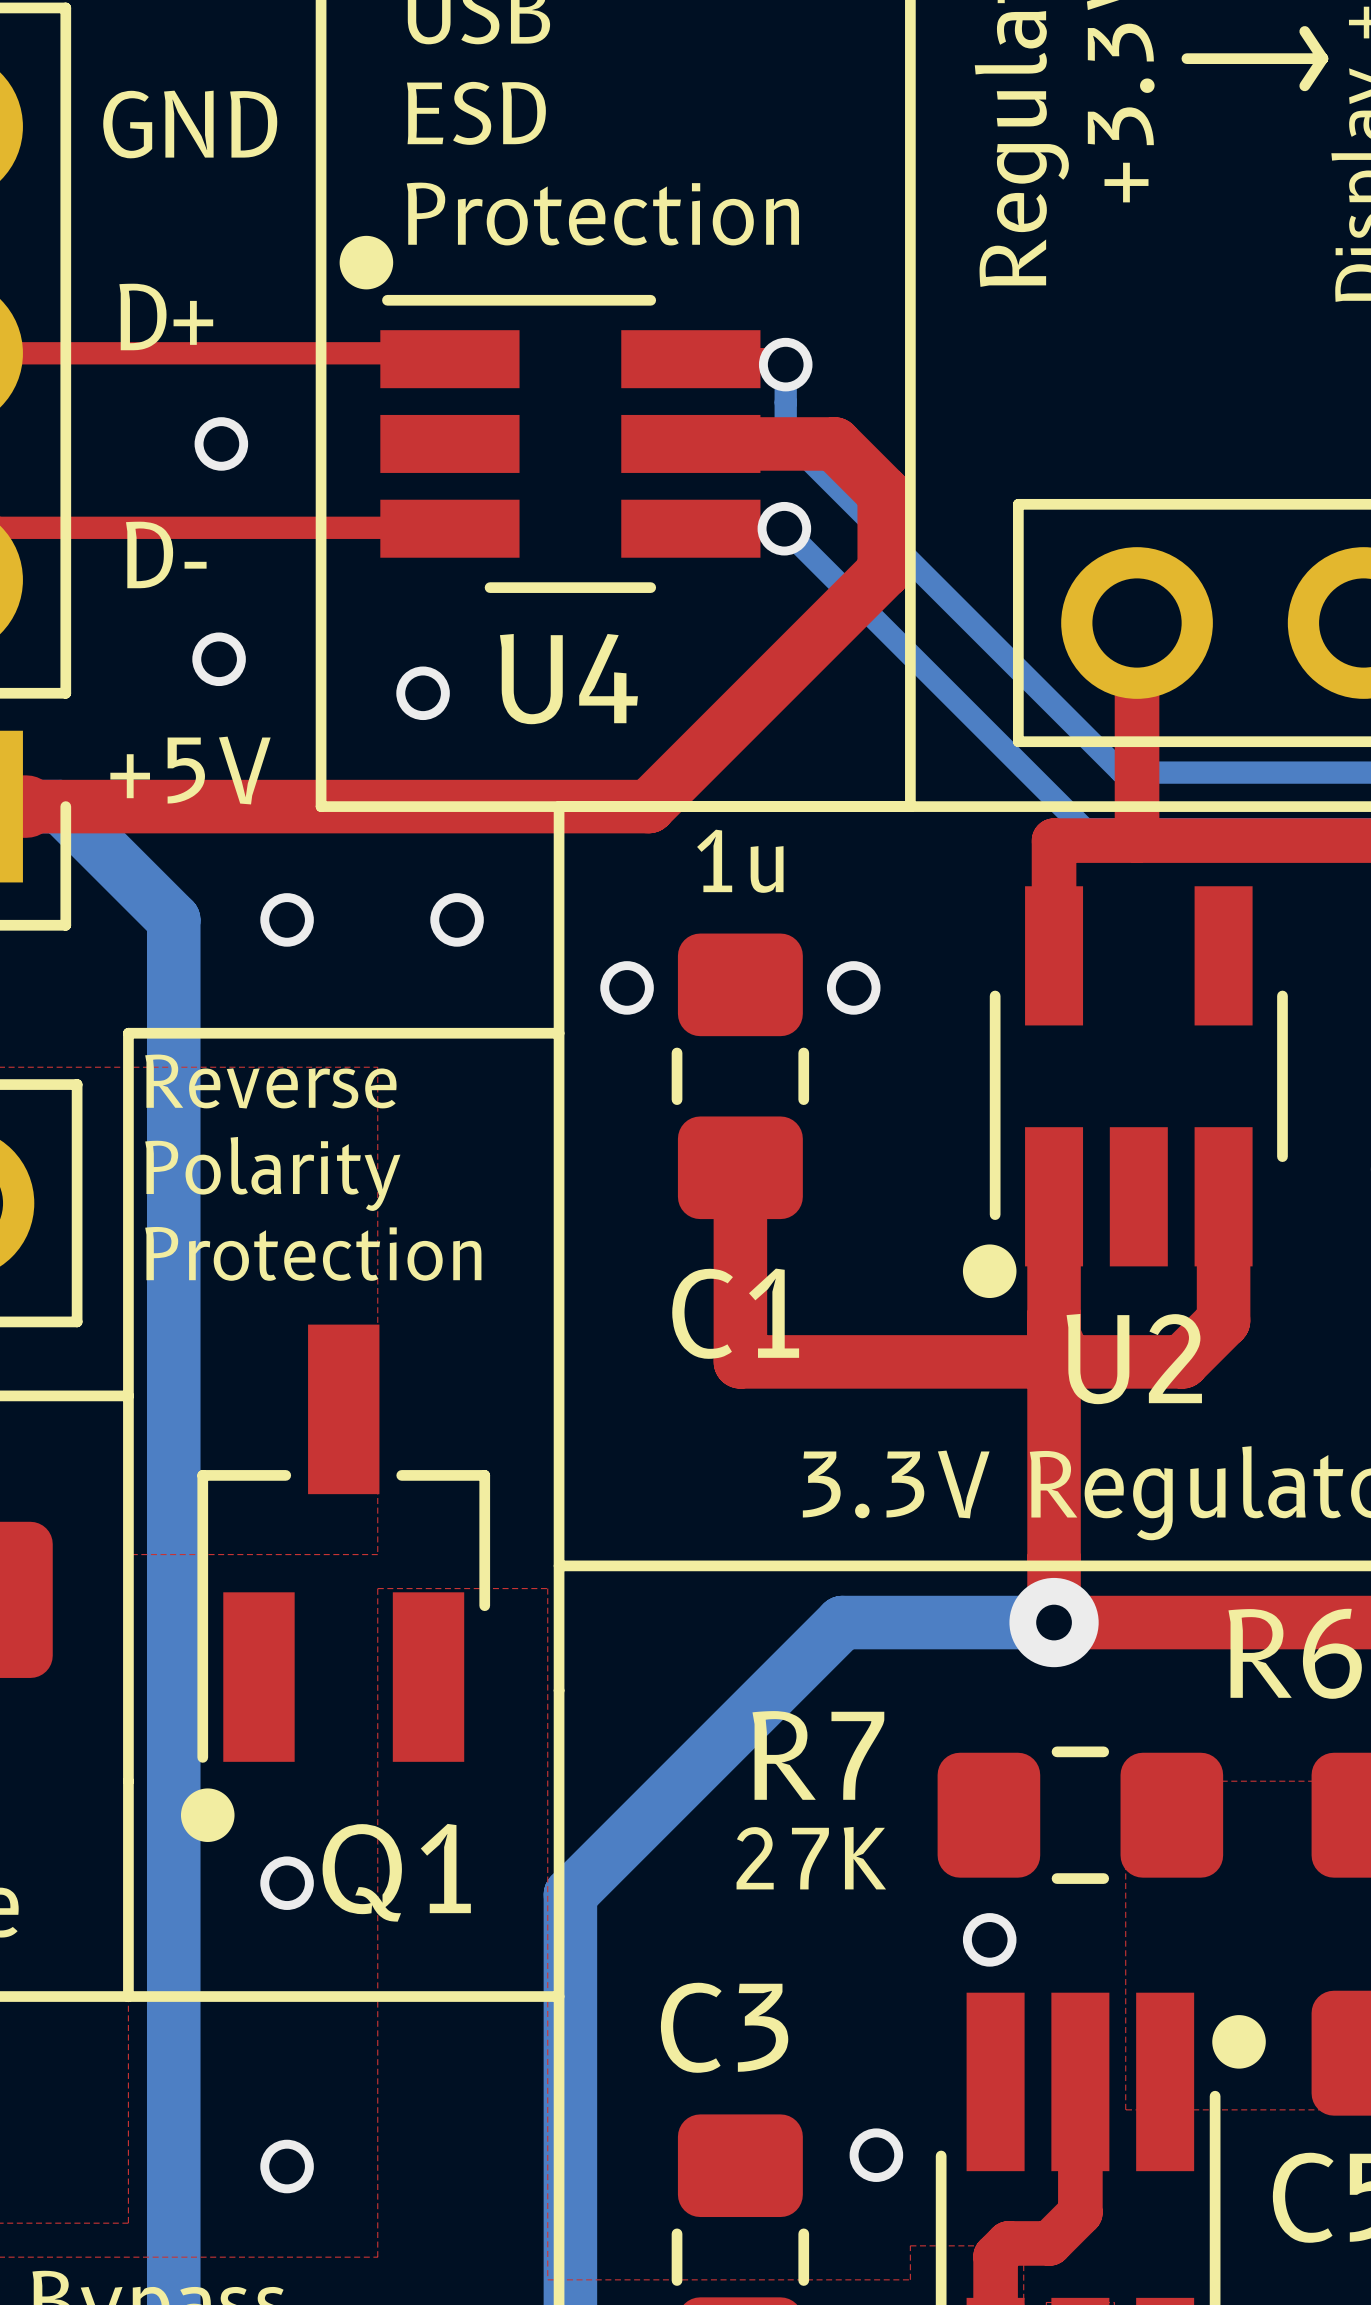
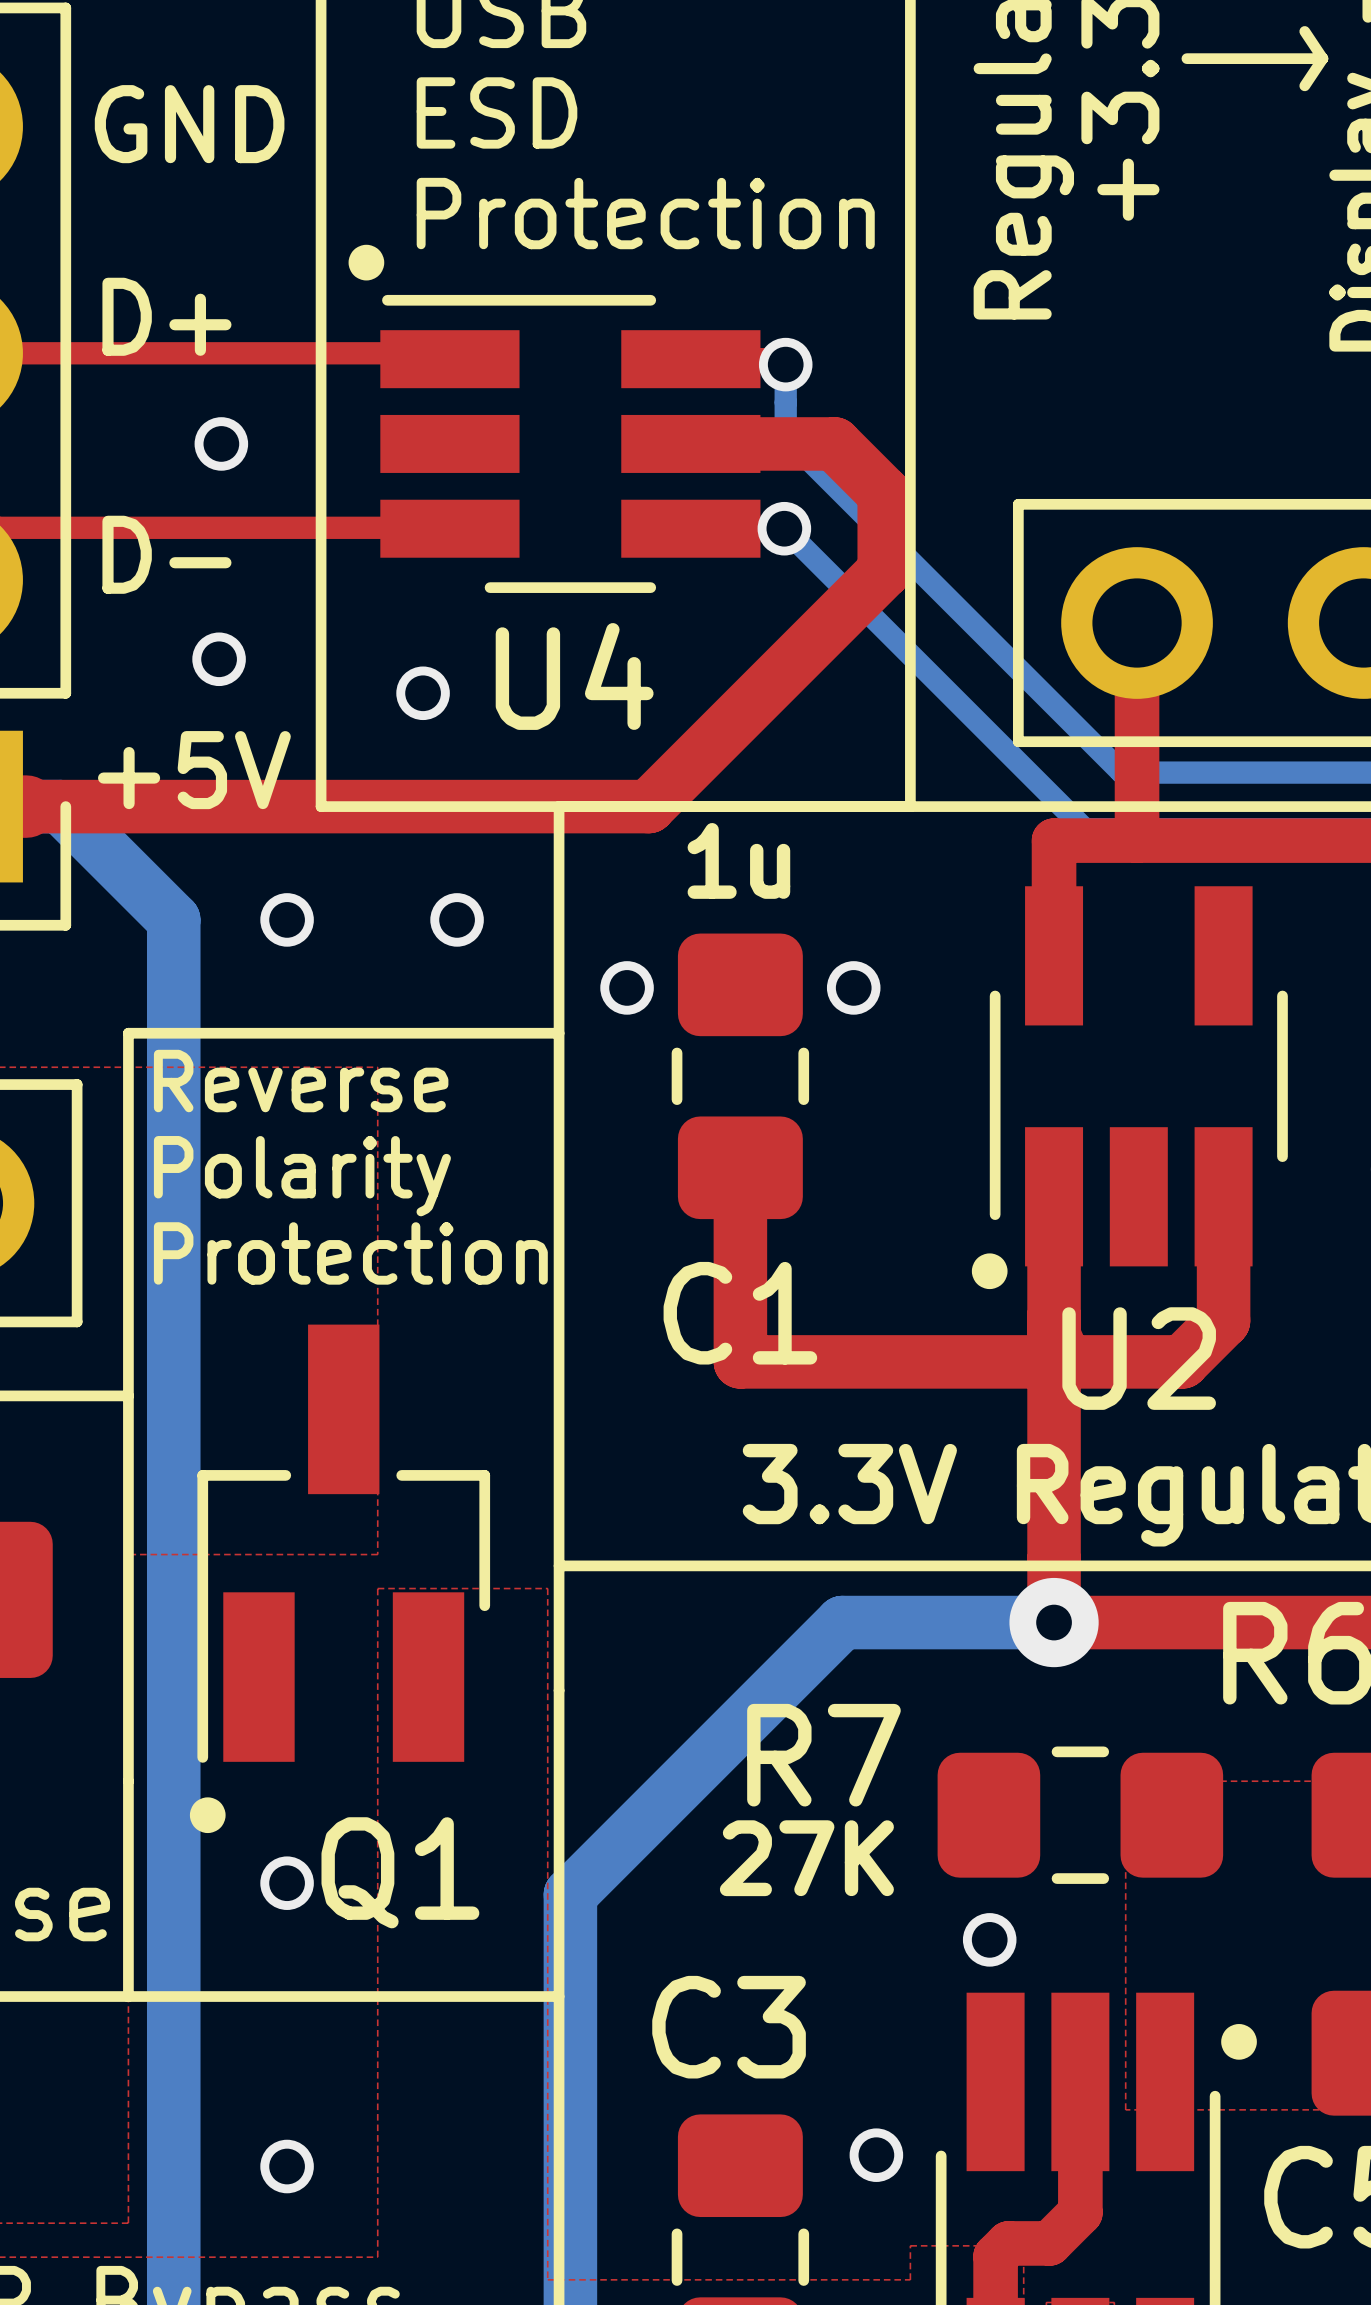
drawing shape: [339, 235, 394, 290] -> [348, 244, 385, 281]
drawing shape: [962, 1244, 1017, 1299] -> [971, 1253, 1008, 1290]
drawing shape: [180, 1788, 235, 1842] -> [189, 1797, 226, 1834]
drawing shape: [1212, 2015, 1266, 2069] -> [1221, 2024, 1257, 2060]

